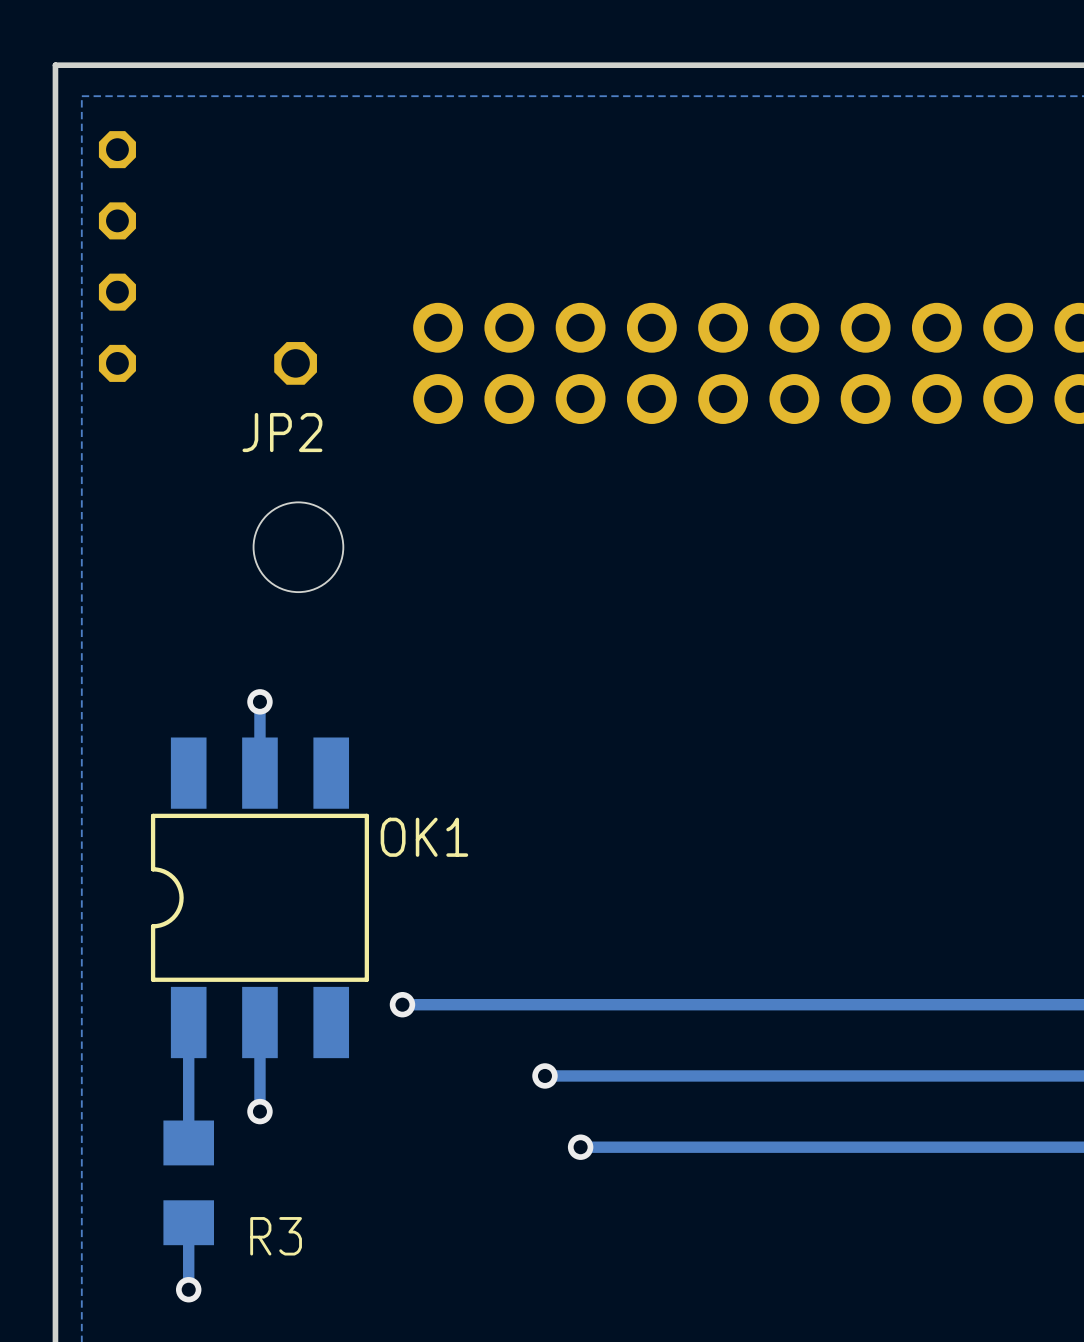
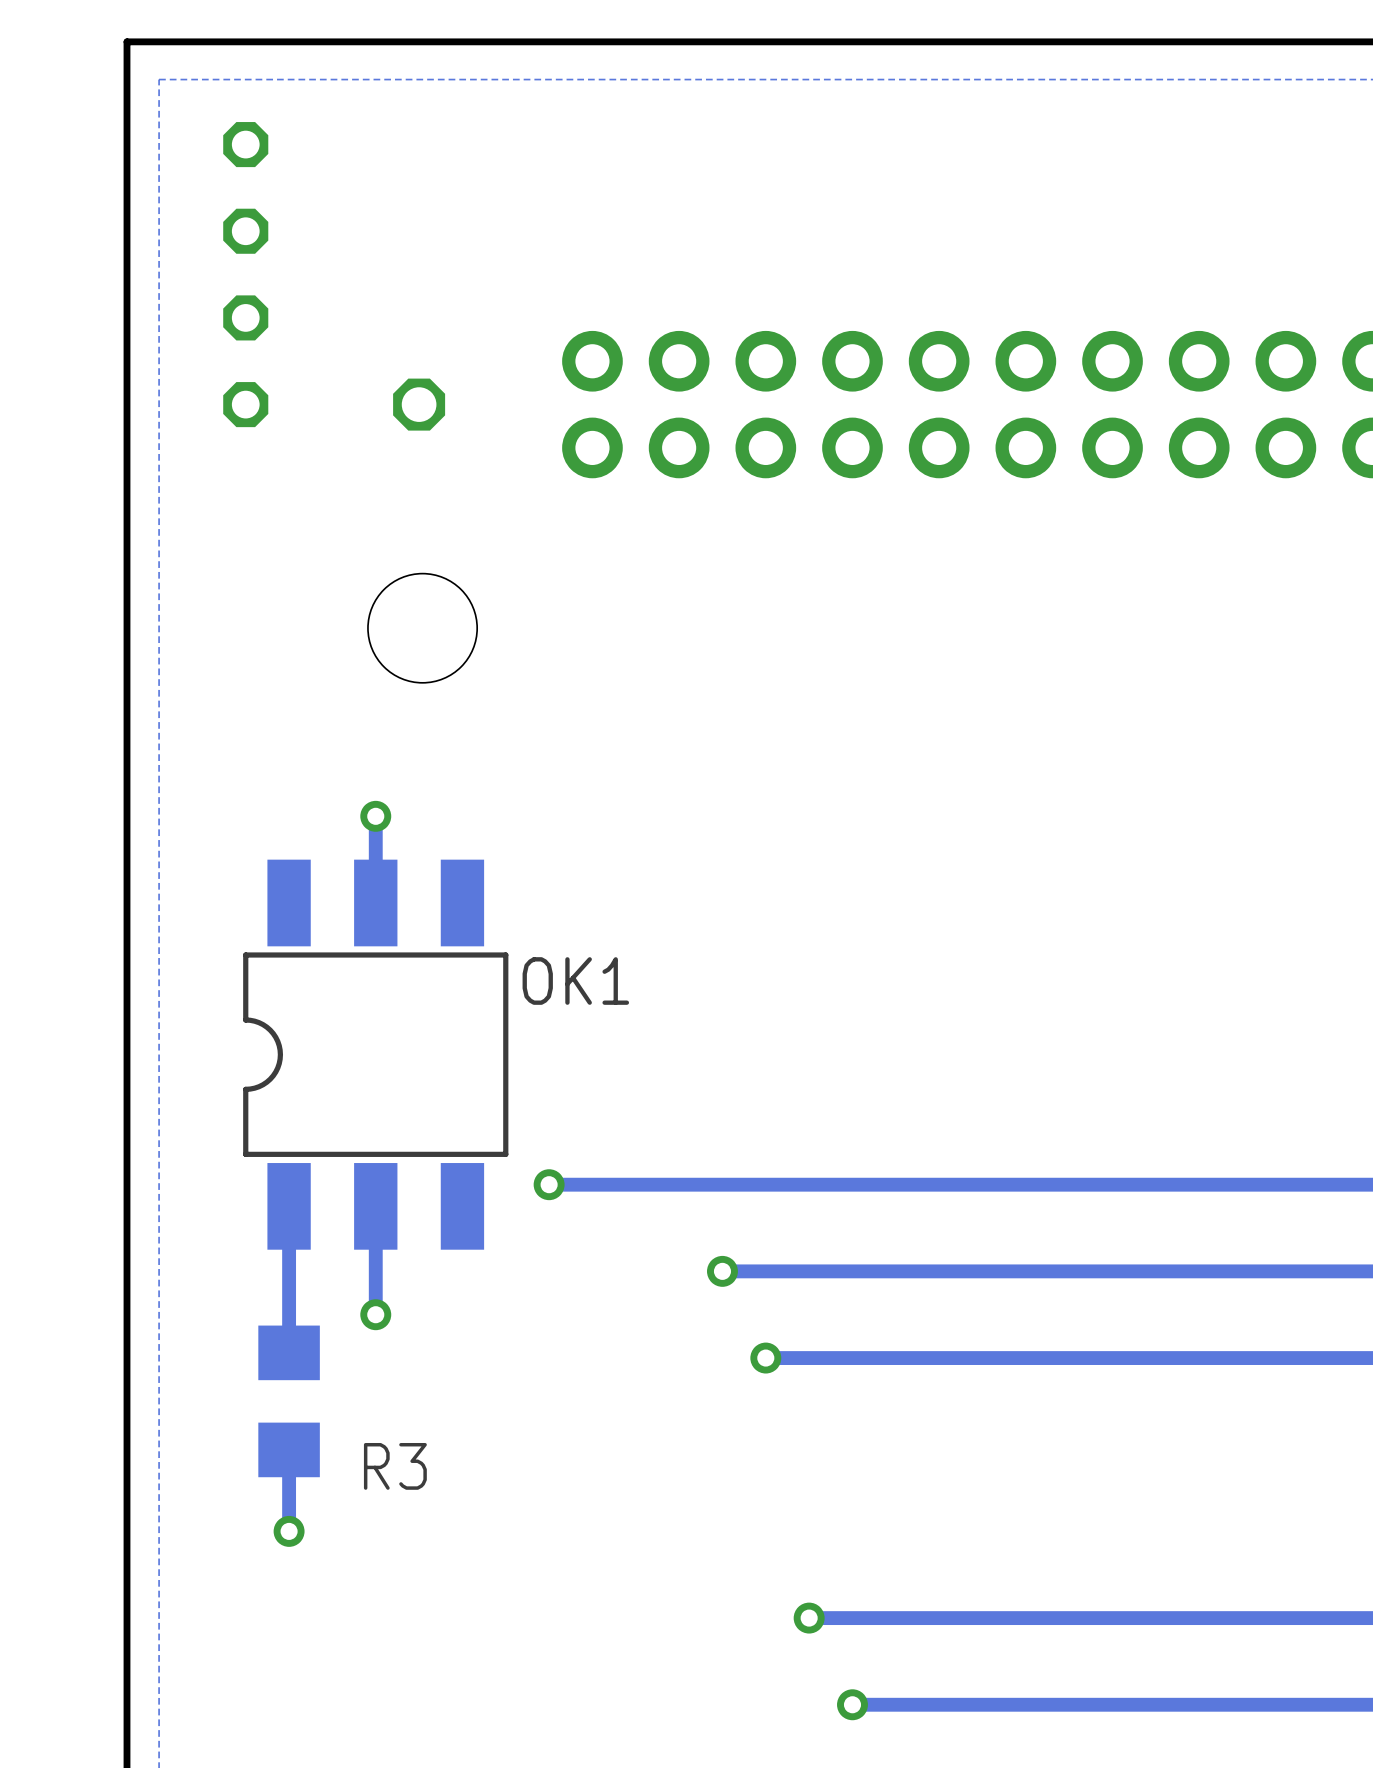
part position: (117, 185) -> (245, 187)
part position: (117, 327) -> (245, 361)
JP2 name: JP2 (282, 432) -> none

